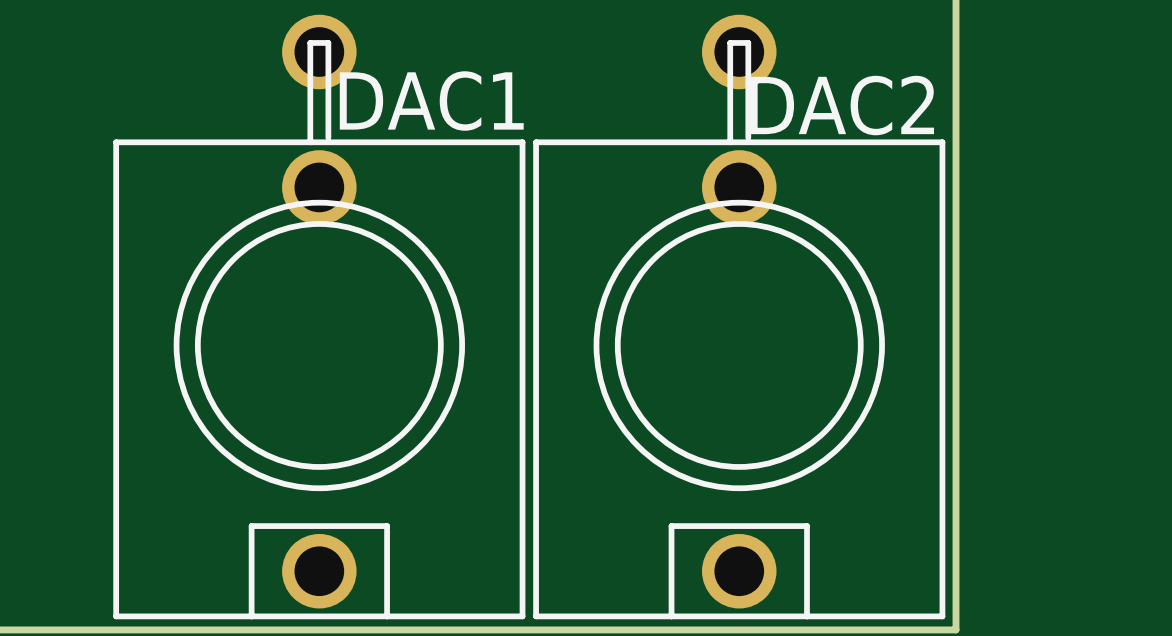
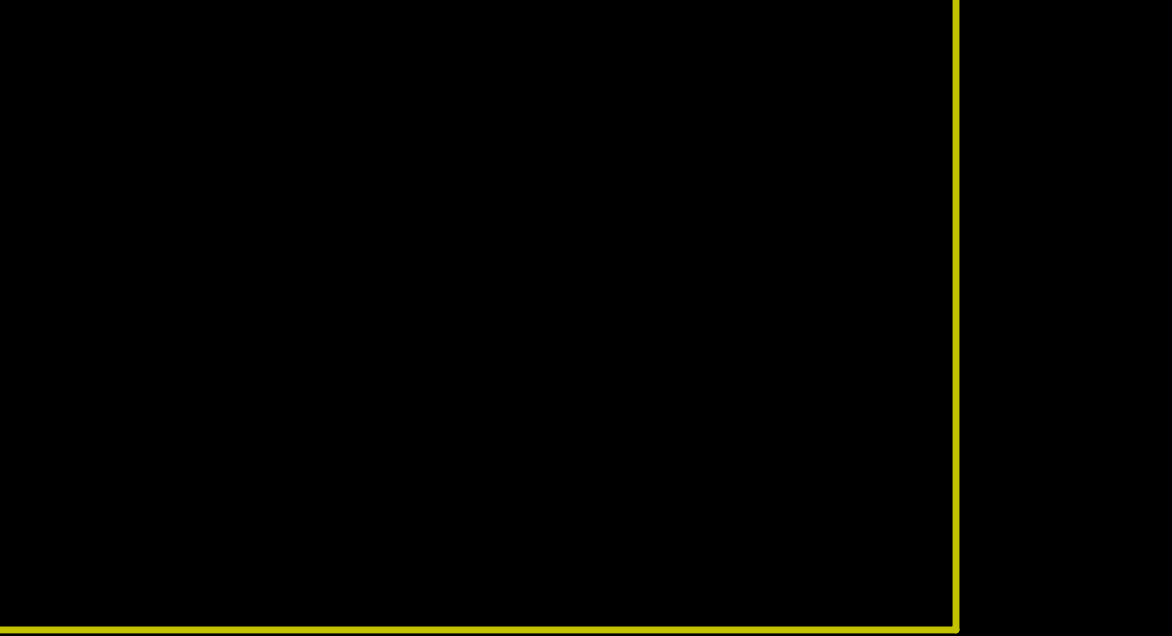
DAC1: (319, 316) -> none
DAC2: (739, 316) -> none

